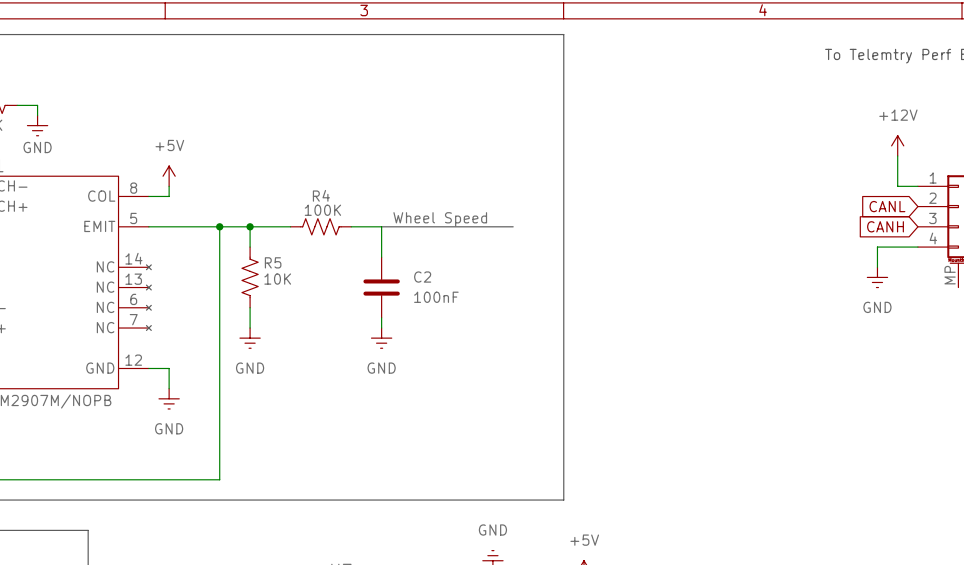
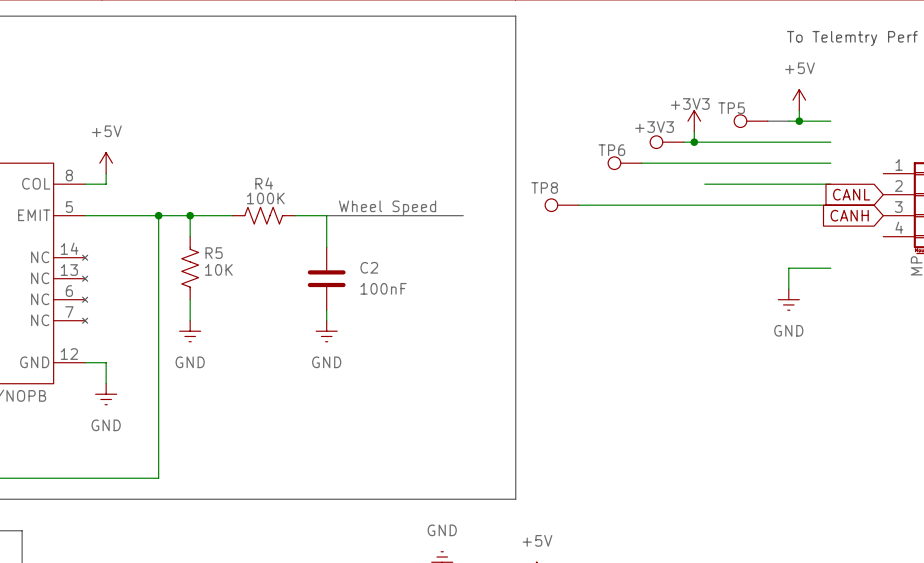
power symbol: none -> +5V (799, 100)
wire: none -> (799, 110) (799, 121)
power symbol: none -> +3V3 (694, 121)
TP5: none -> (750, 121)
line: none -> (767, 121) (788, 121)
wire: none -> (788, 121) (830, 121)
junction: none -> (799, 121)
wire: none -> (694, 131) (694, 142)
power symbol: +12V (897, 145) -> none
+3V3: none -> (666, 142)
wire: none -> (683, 142) (830, 142)
junction: none -> (694, 142)
wire: (897, 155) (897, 186) (917, 186) -> none
TP6: none -> (624, 163)
wire: none -> (641, 163) (830, 163)
wire: none -> (704, 184) (830, 184)
TP8: none -> (561, 205)
wire: none -> (578, 205) (830, 205)
wire: (917, 247) (877, 247) (877, 267) -> (830, 268) (788, 268) (788, 289)
power symbol position: GND (877, 277) -> GND (788, 299)

